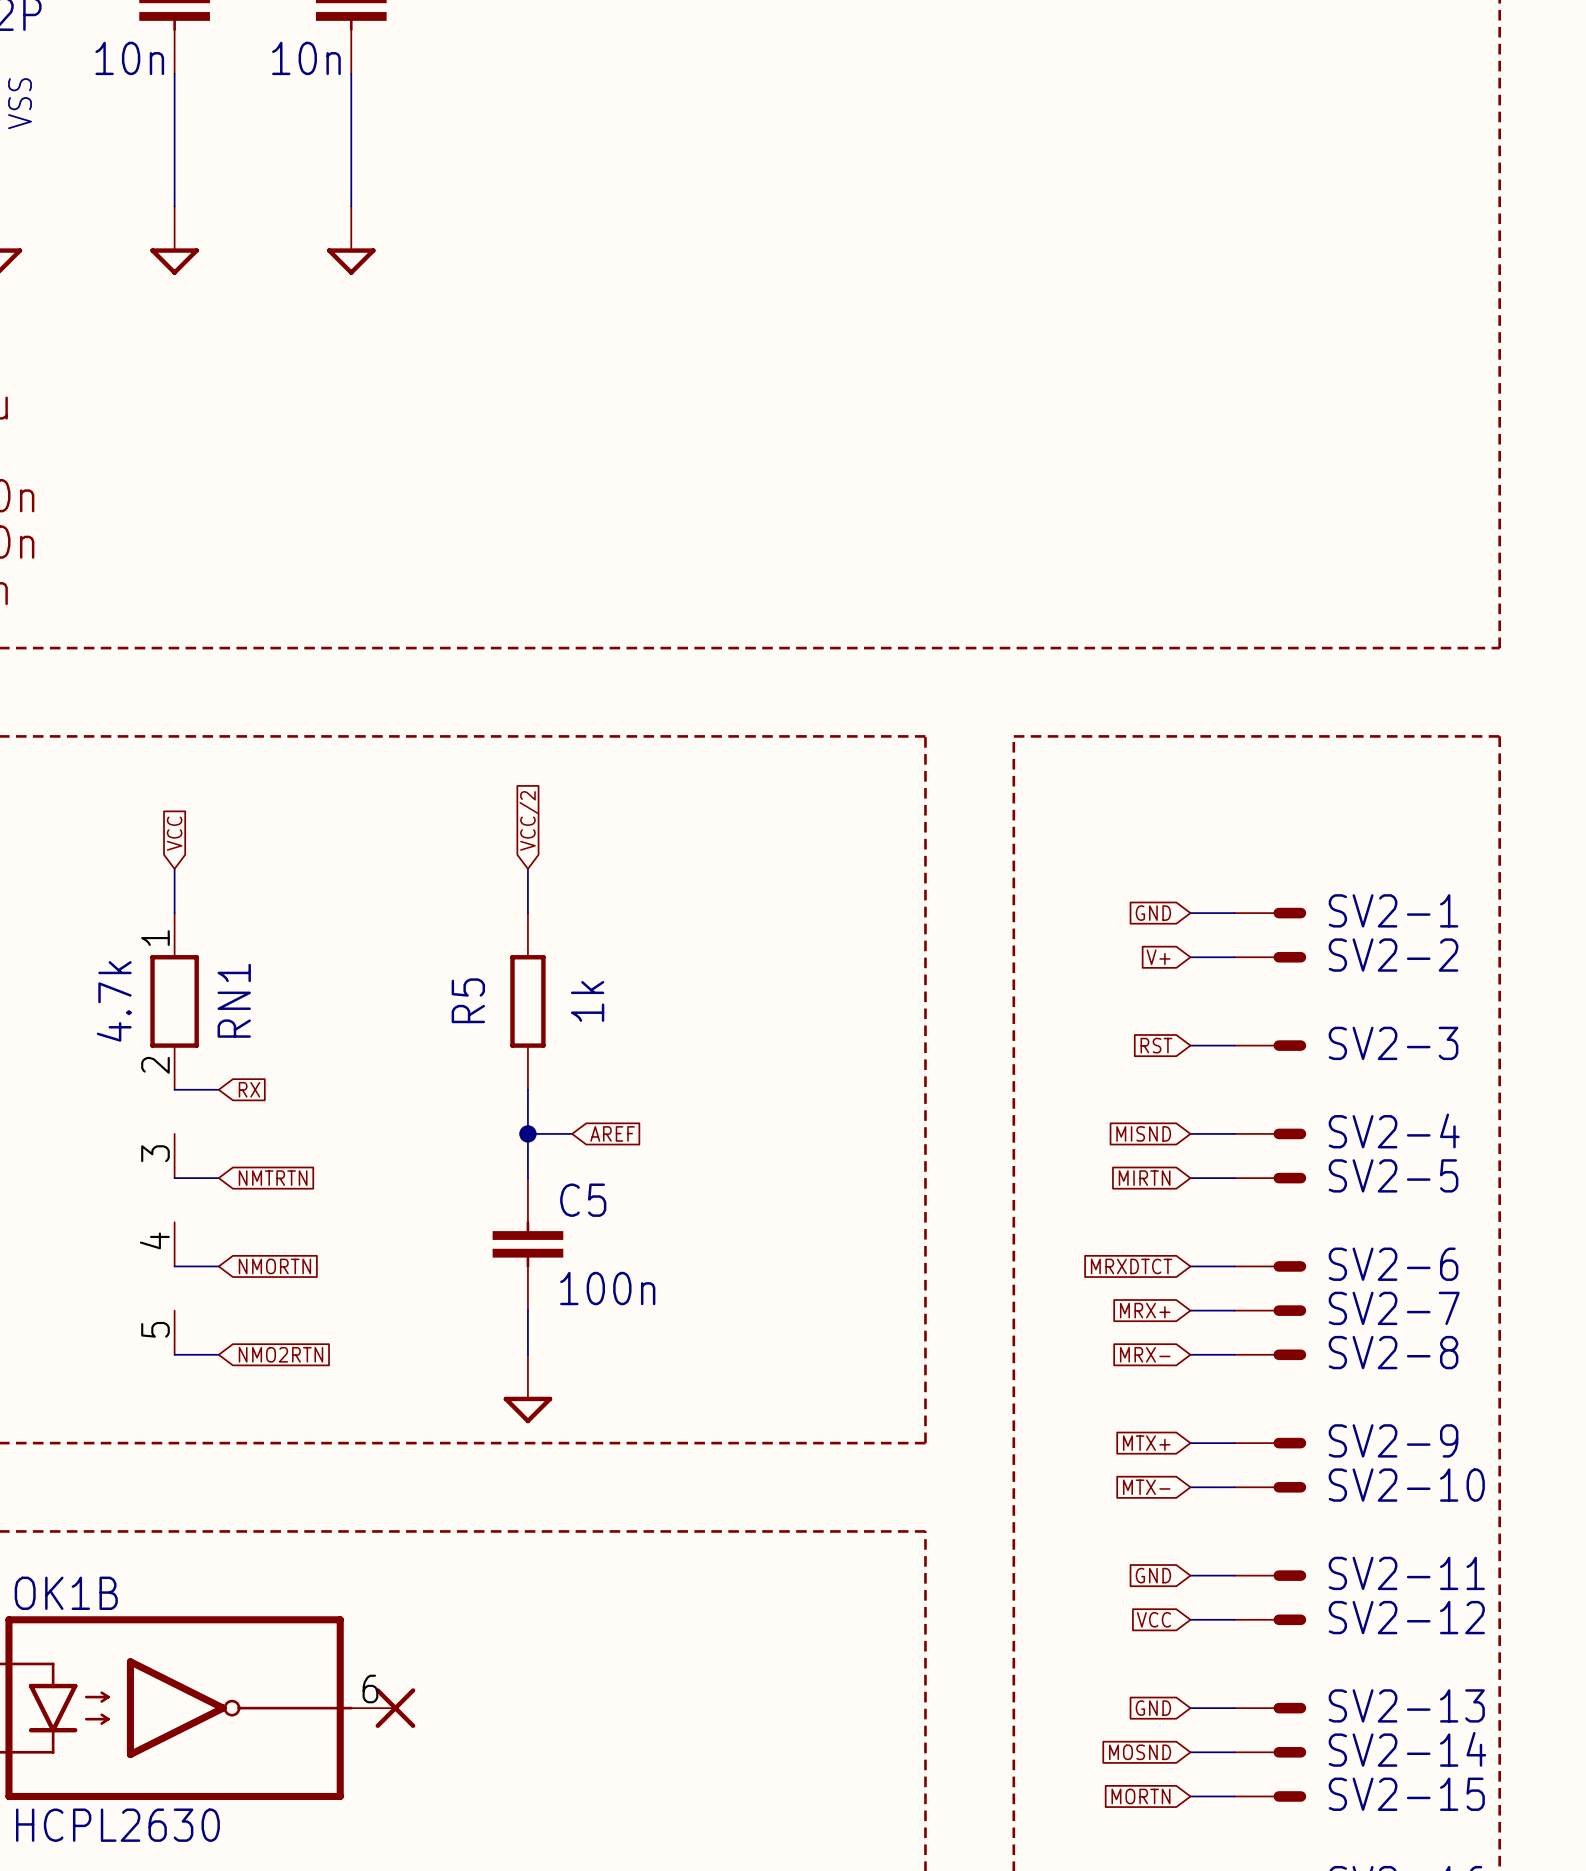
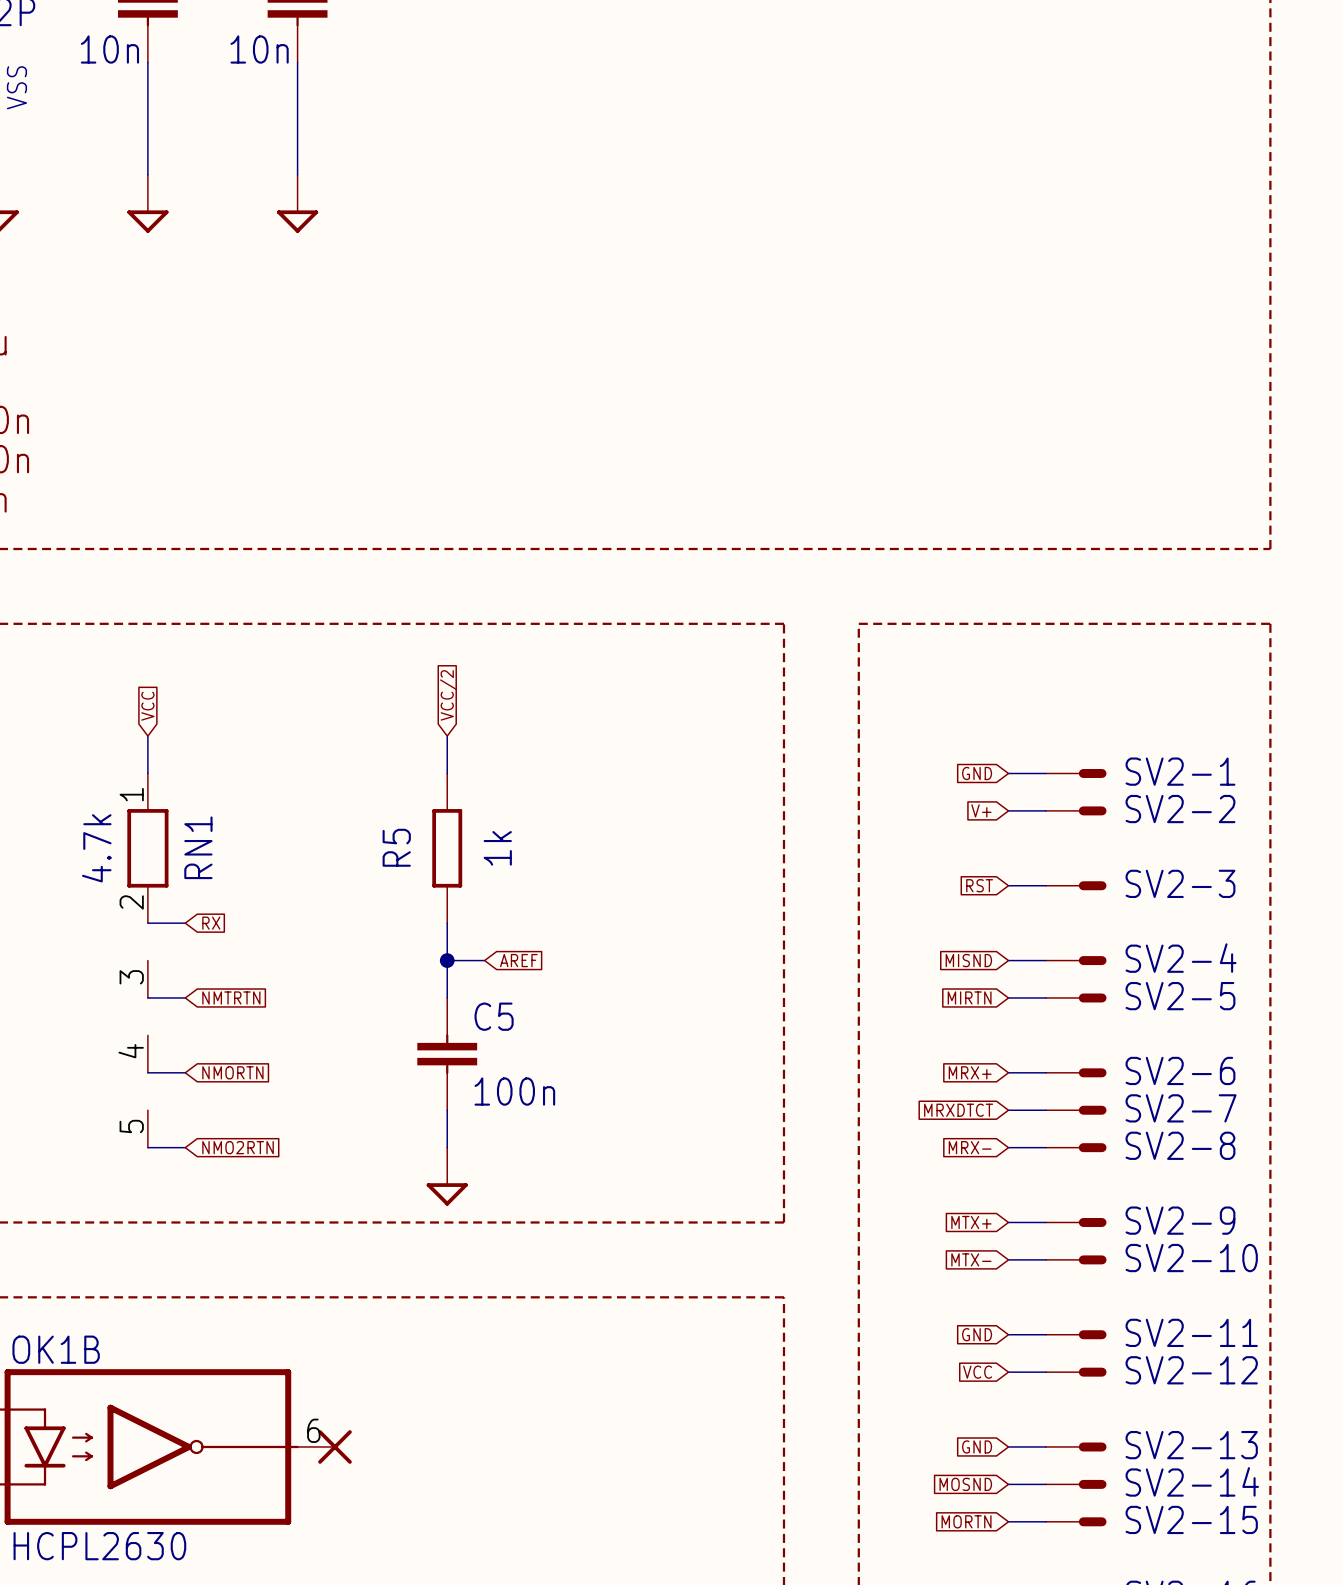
global label: MRXDTCT (1131, 1266) -> MRX+ (970, 1072)
global label: MRX+ (1145, 1310) -> MRXDTCT (958, 1110)

